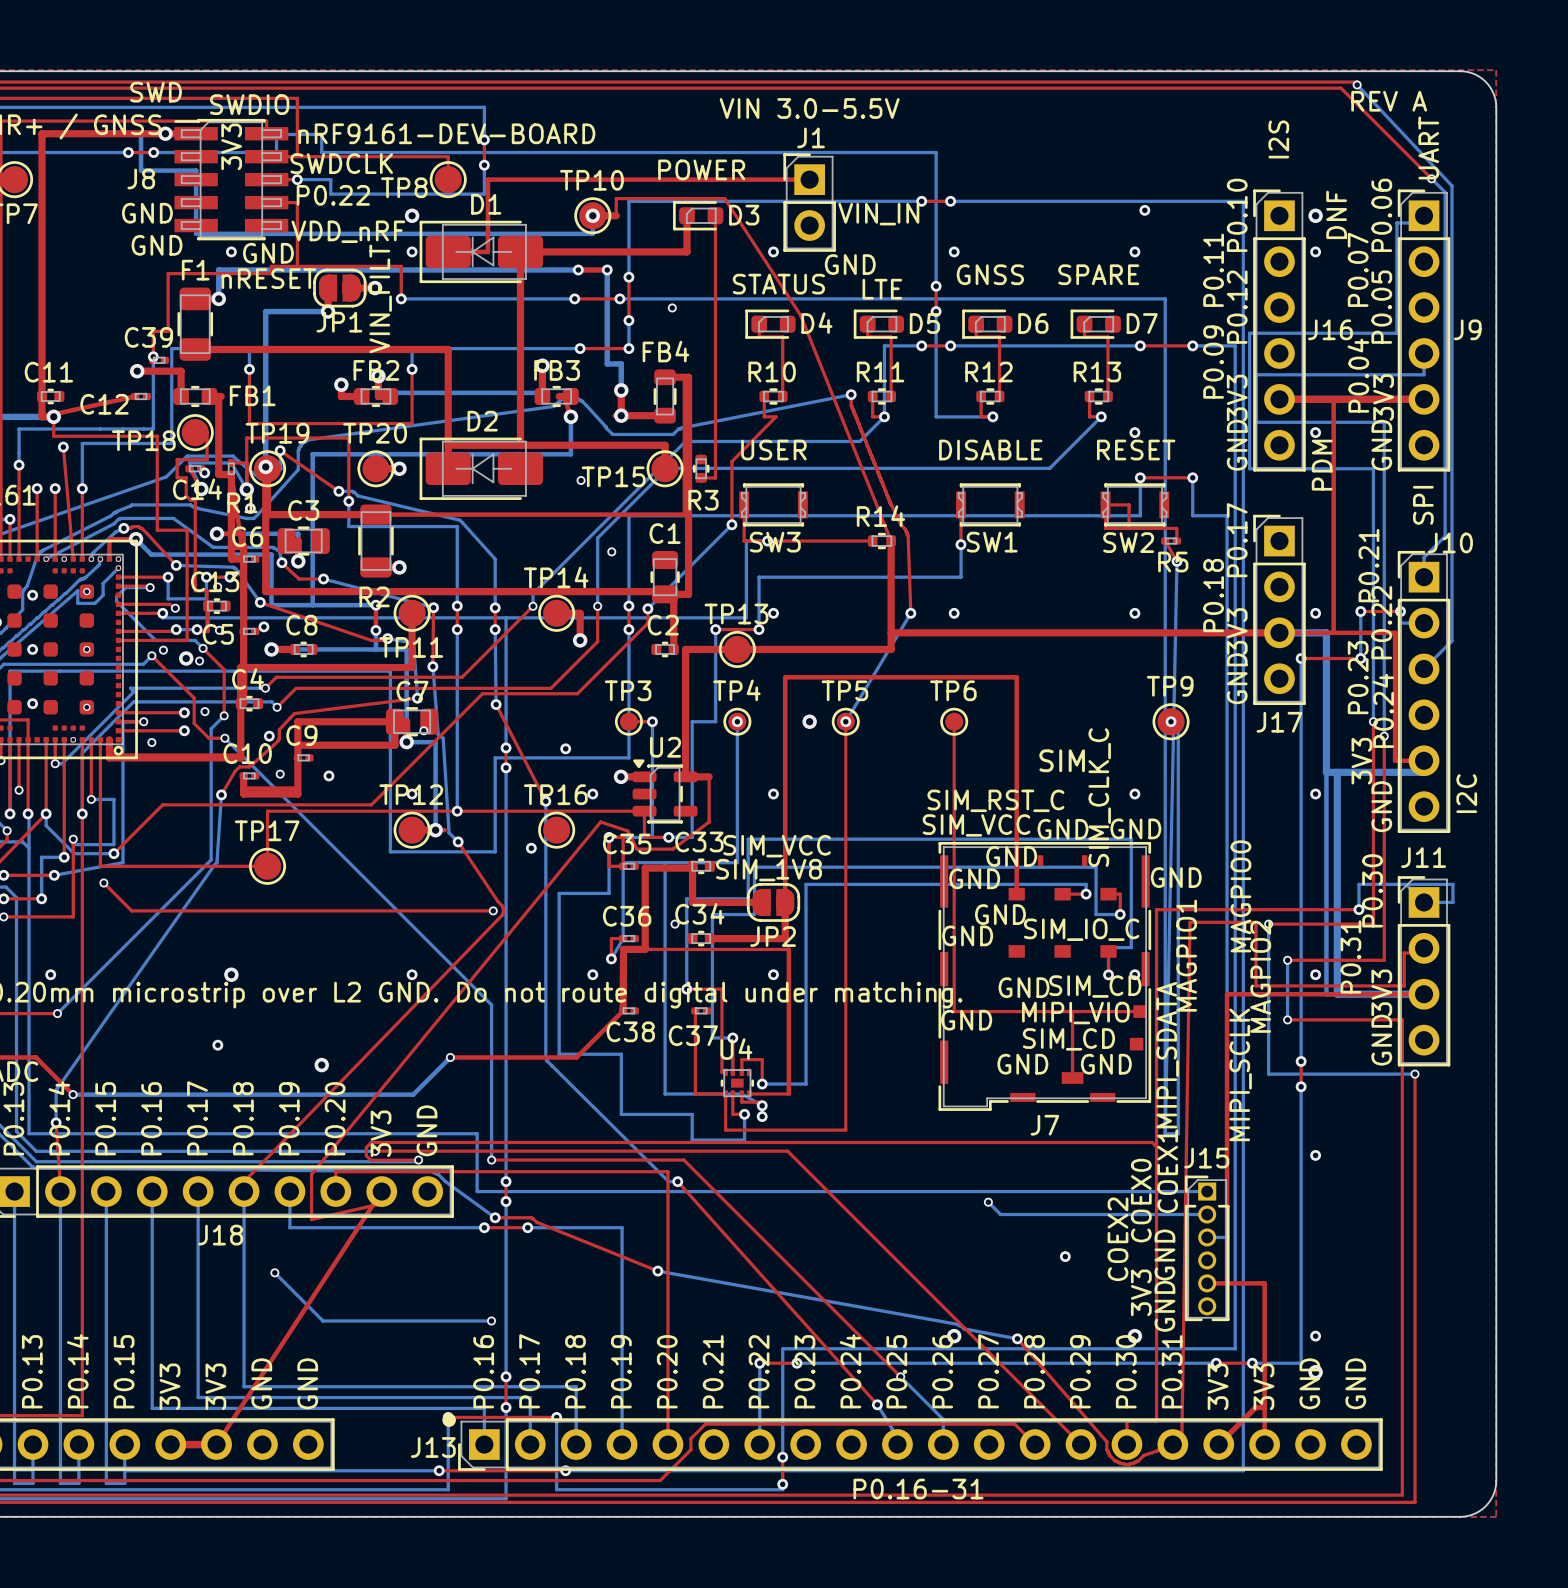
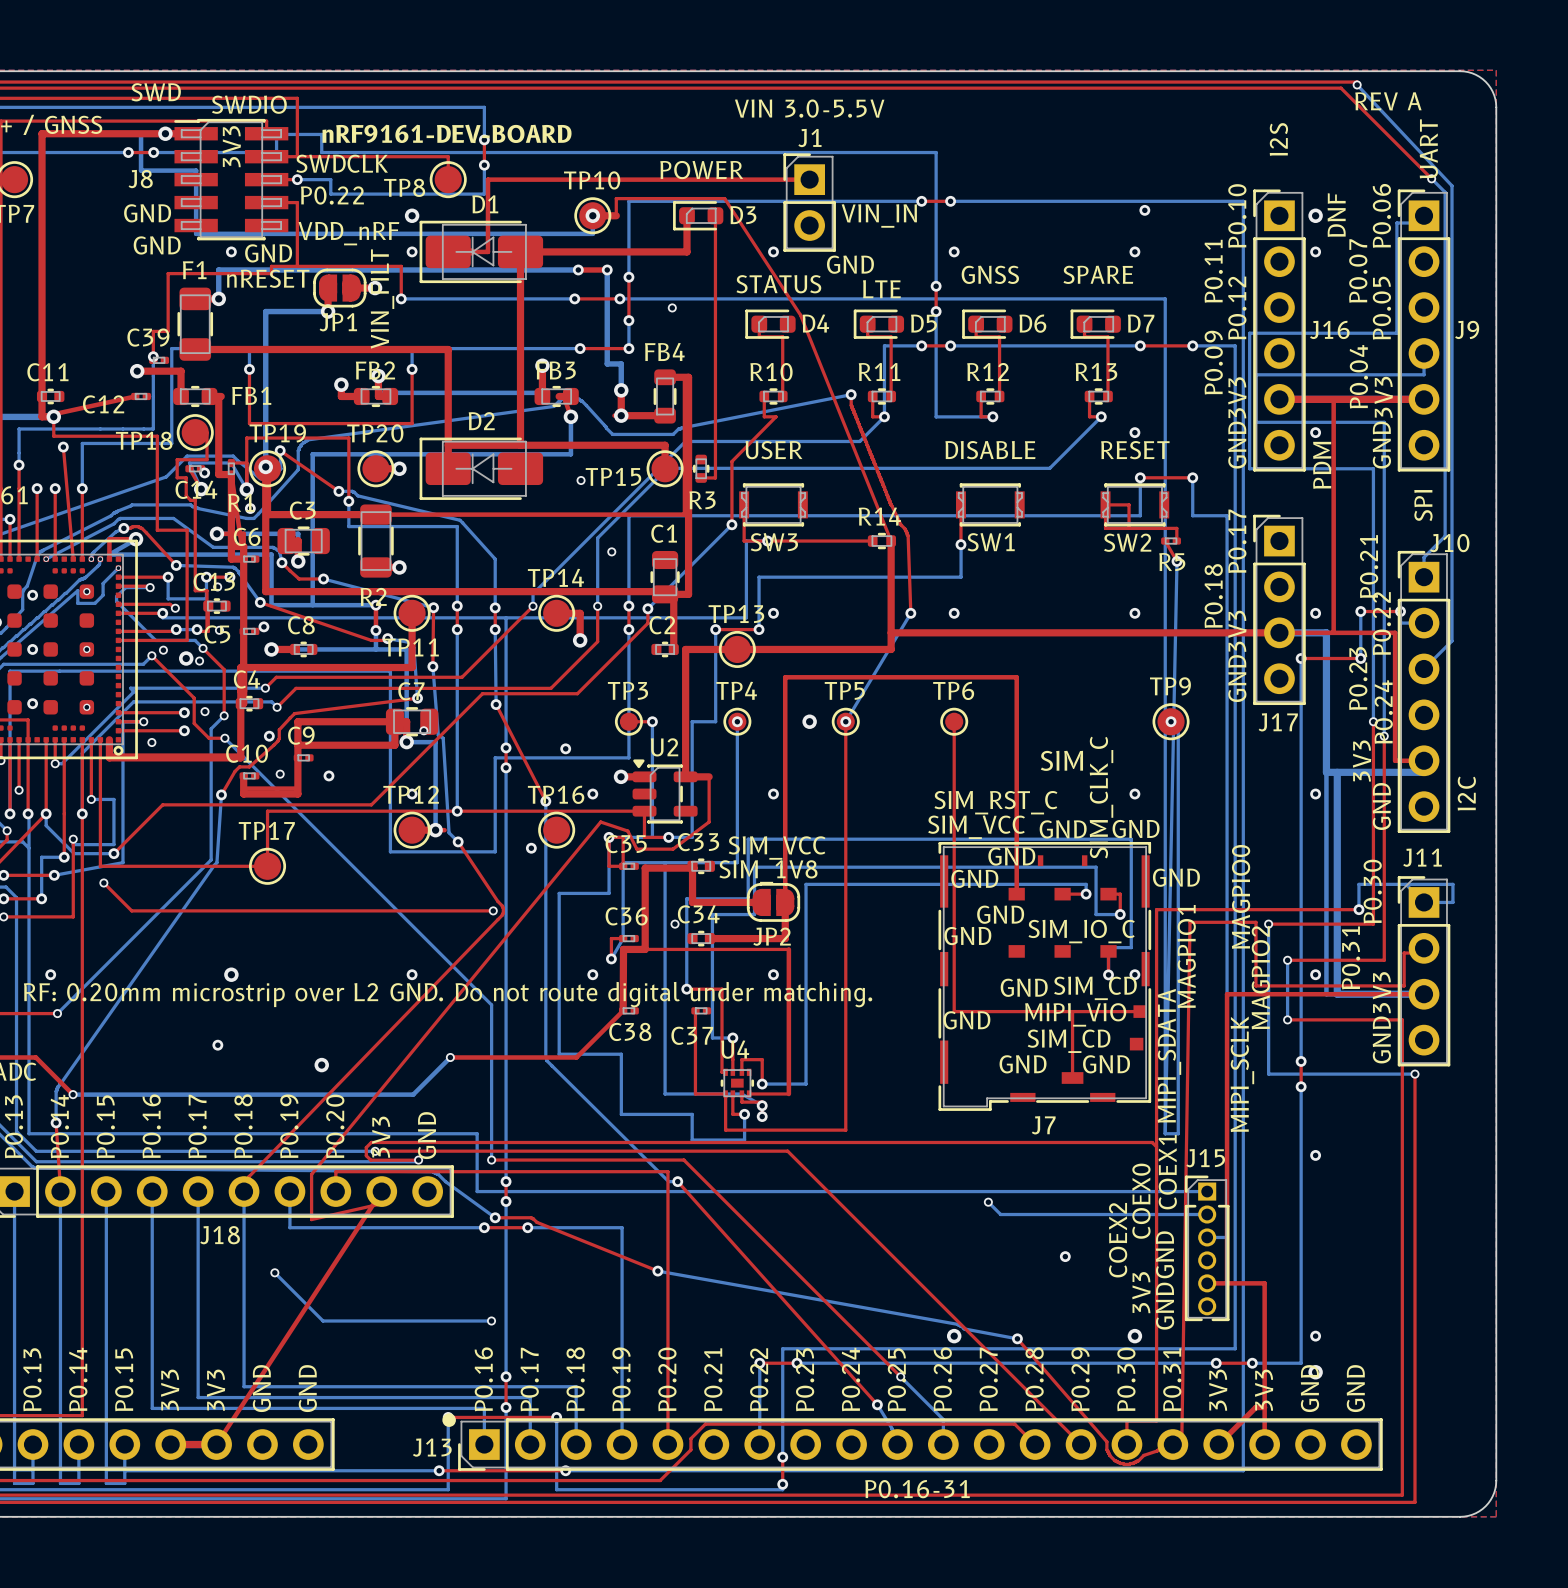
bottom track: (136, 539) (151, 554) -> (136, 539) (109, 554) (151, 554)
via: (64, 559) -> none
via: (118, 559) -> none
via: (73, 739) -> none

